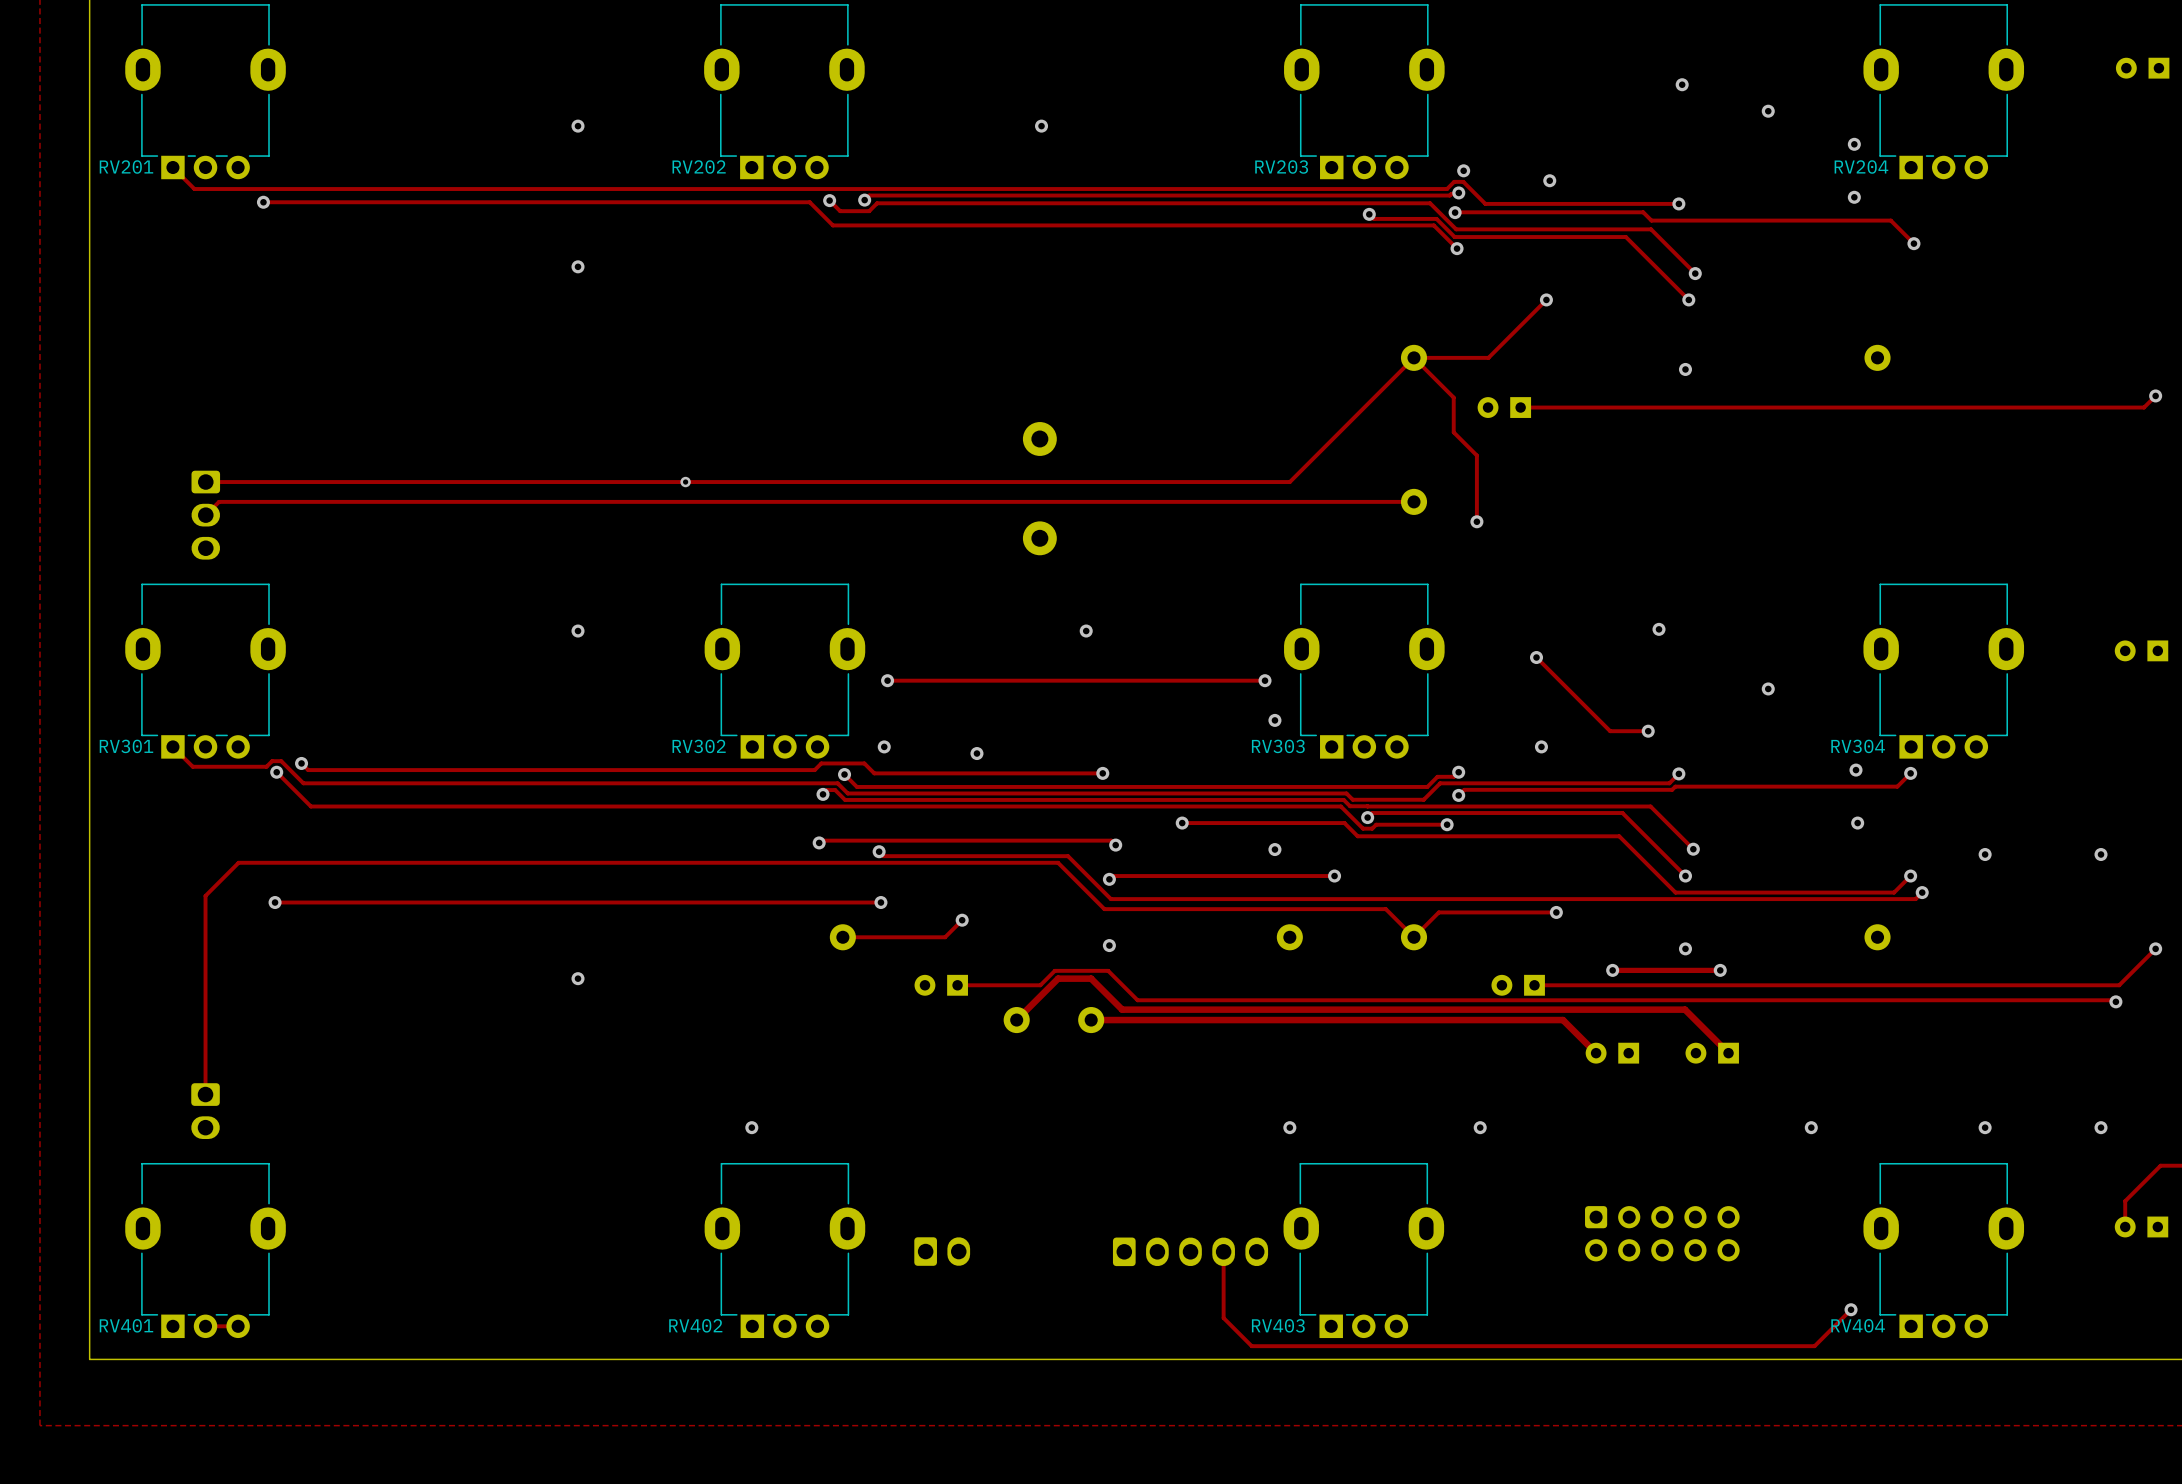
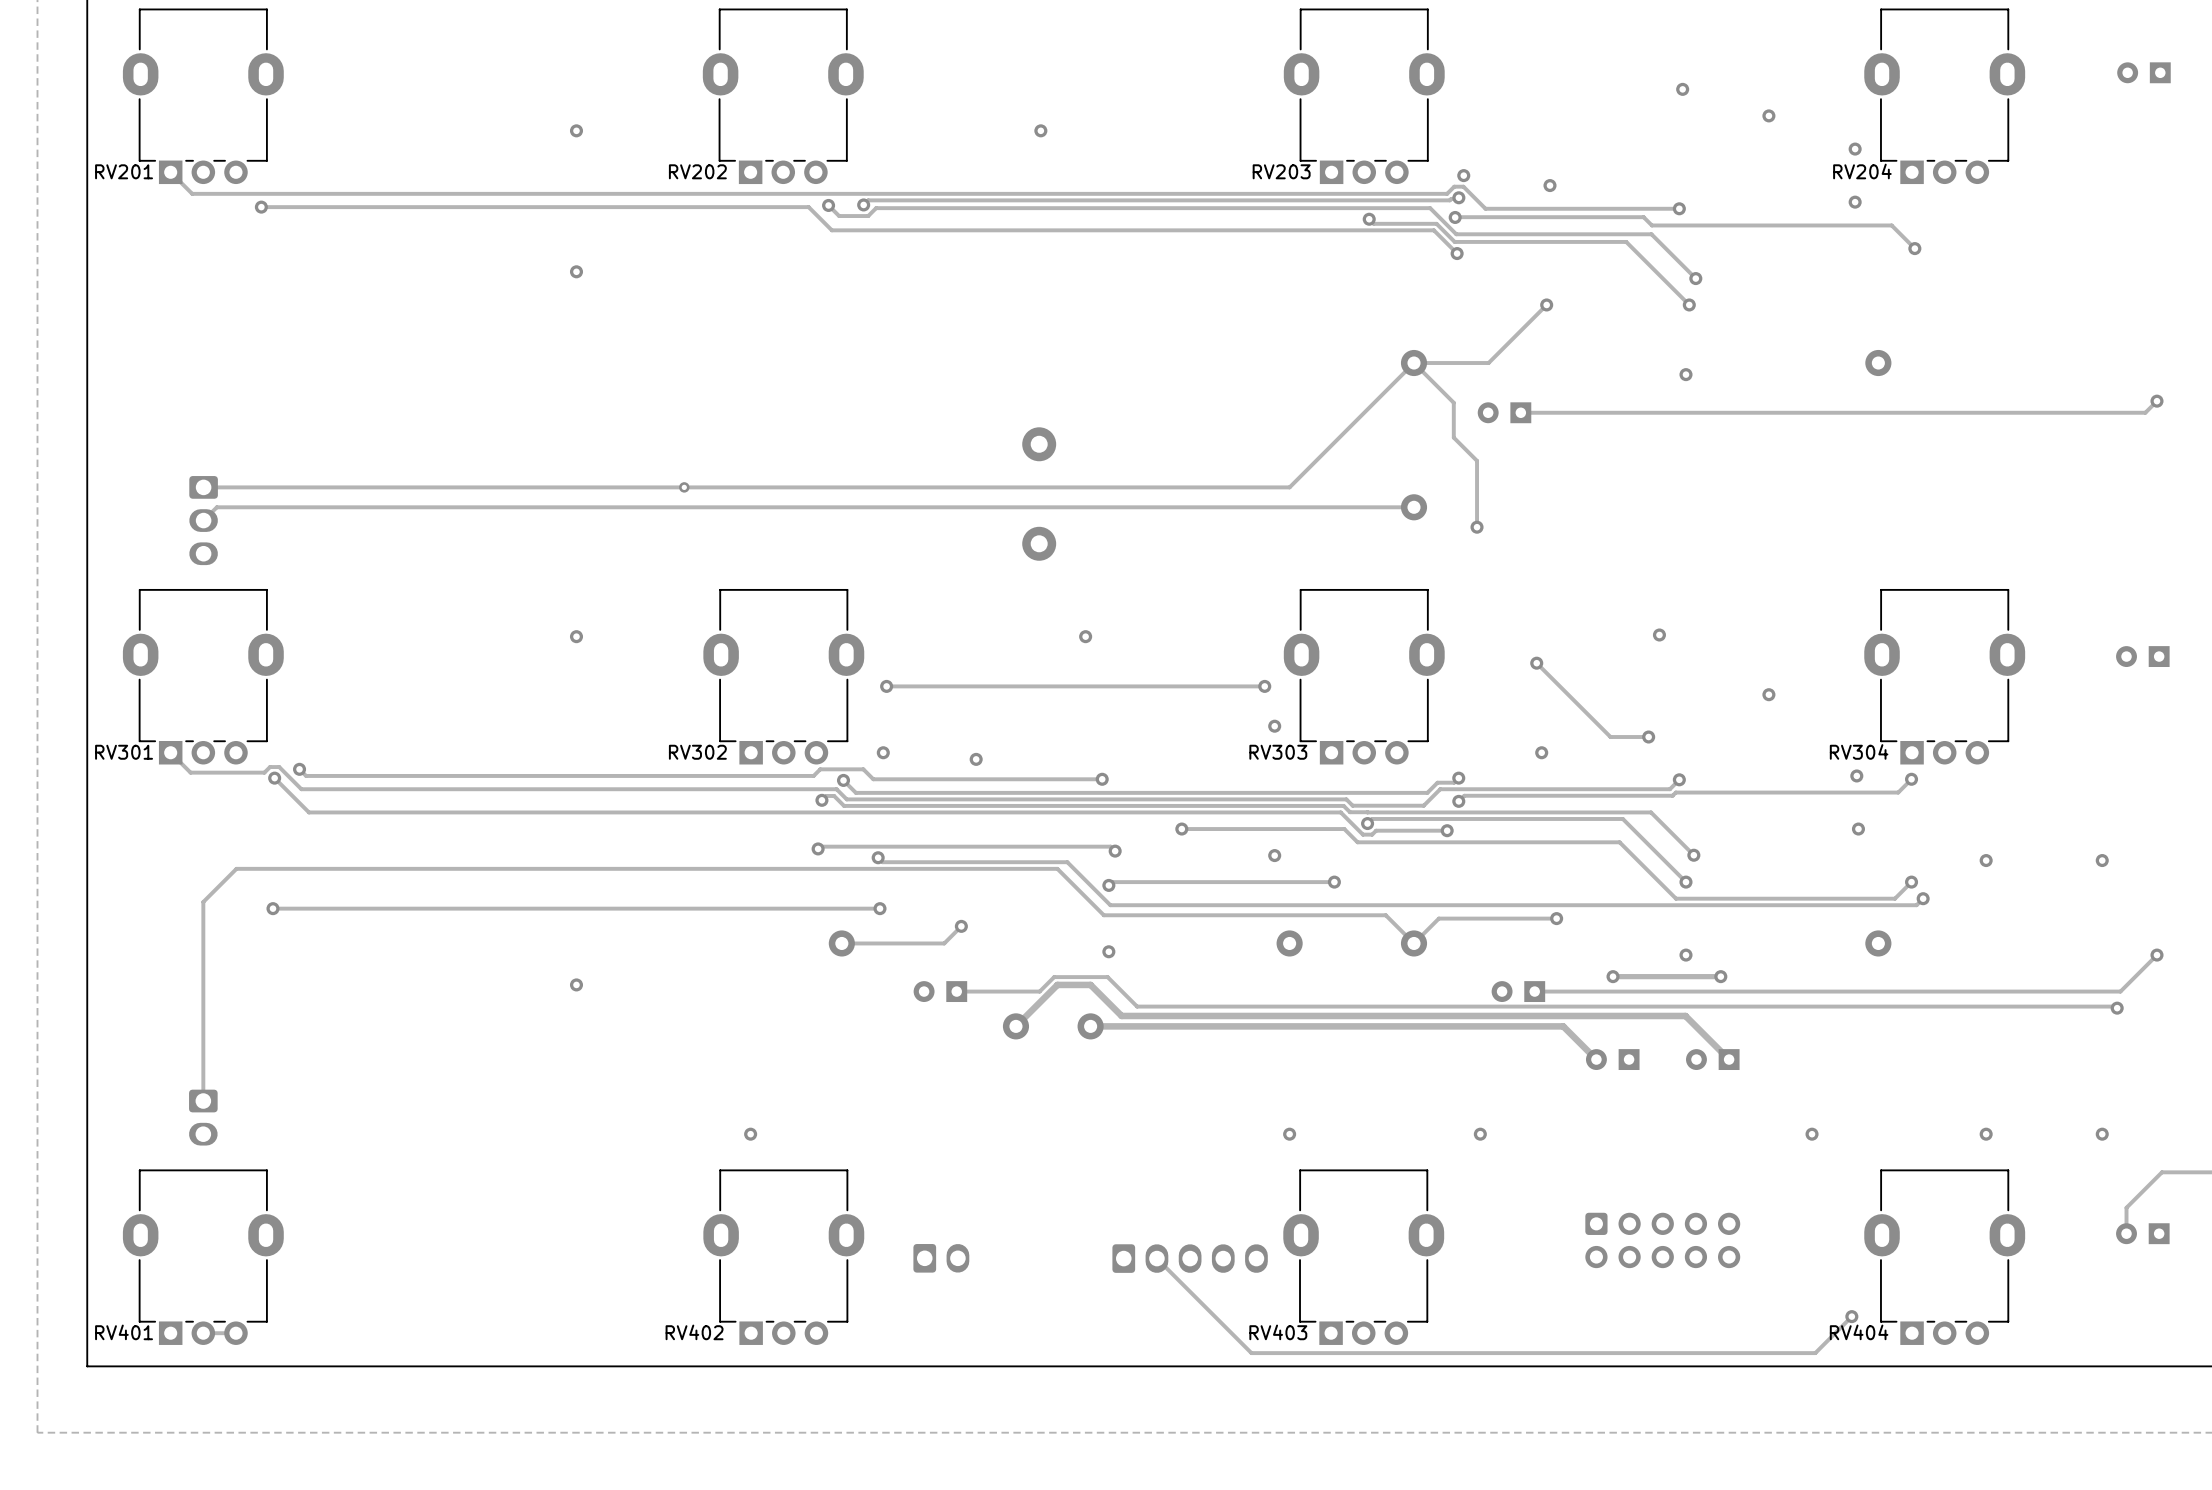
track: (1223, 1251) (1223, 1318) -> (1156, 1258) (1223, 1324)

